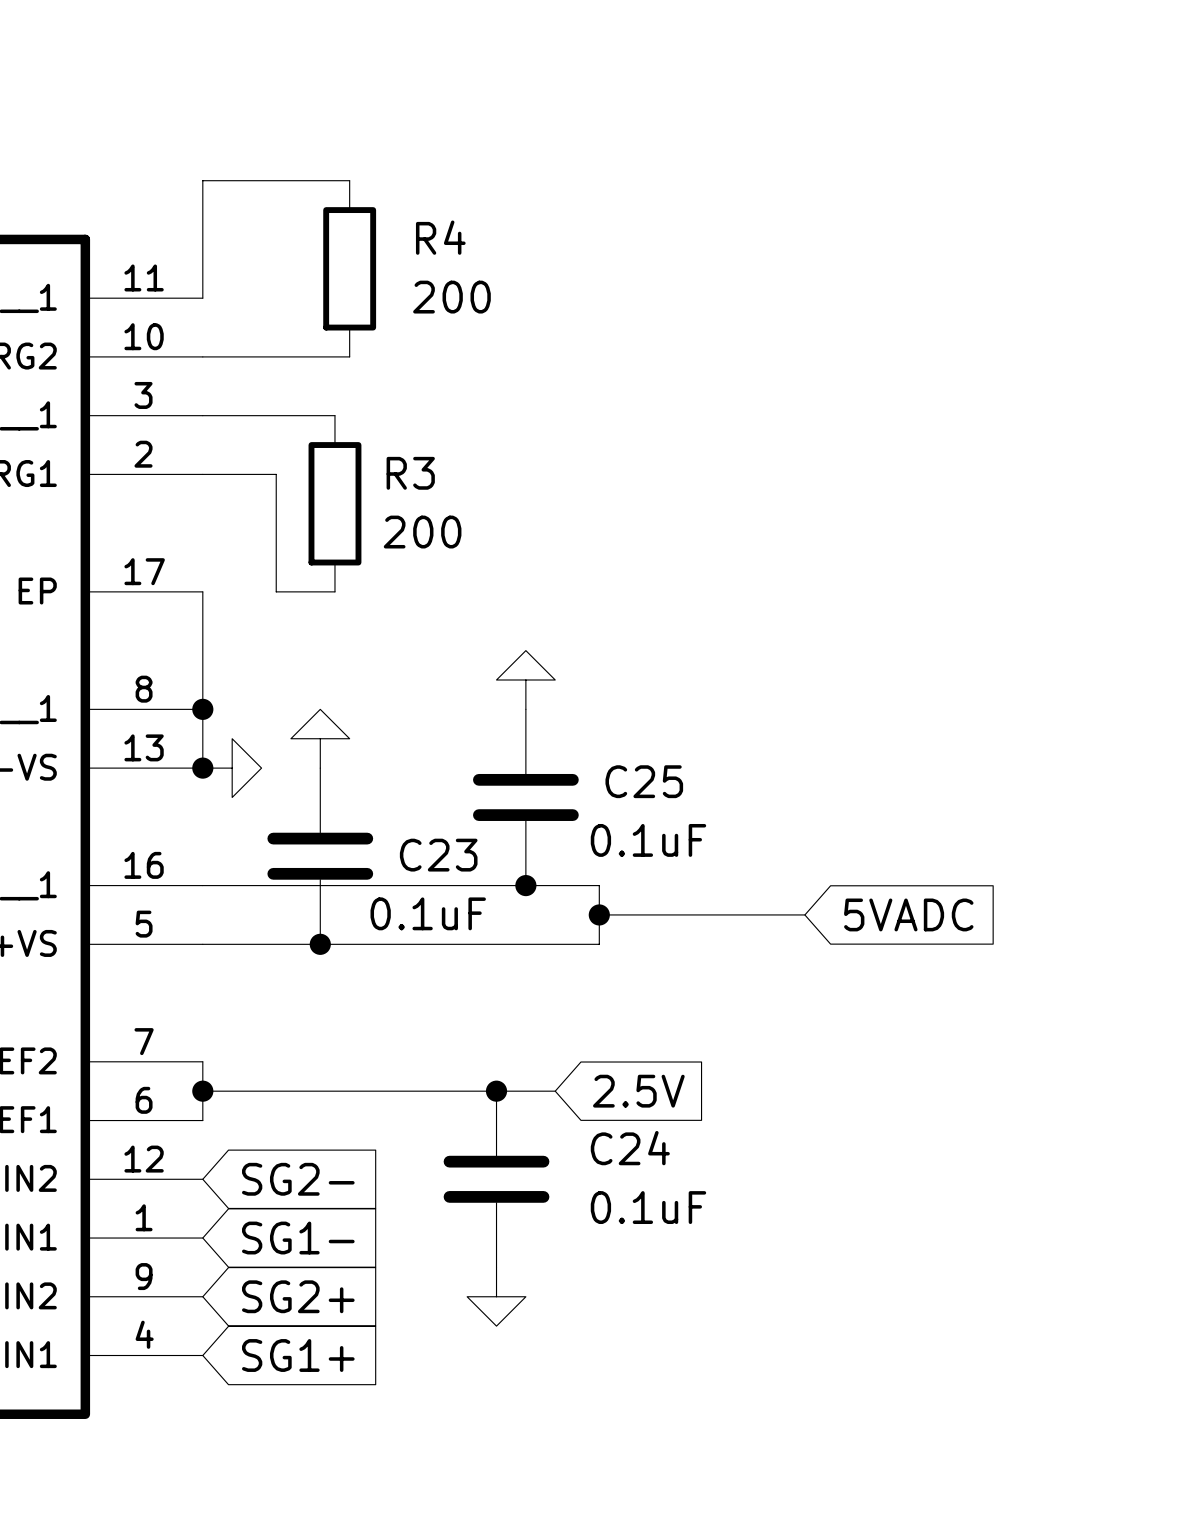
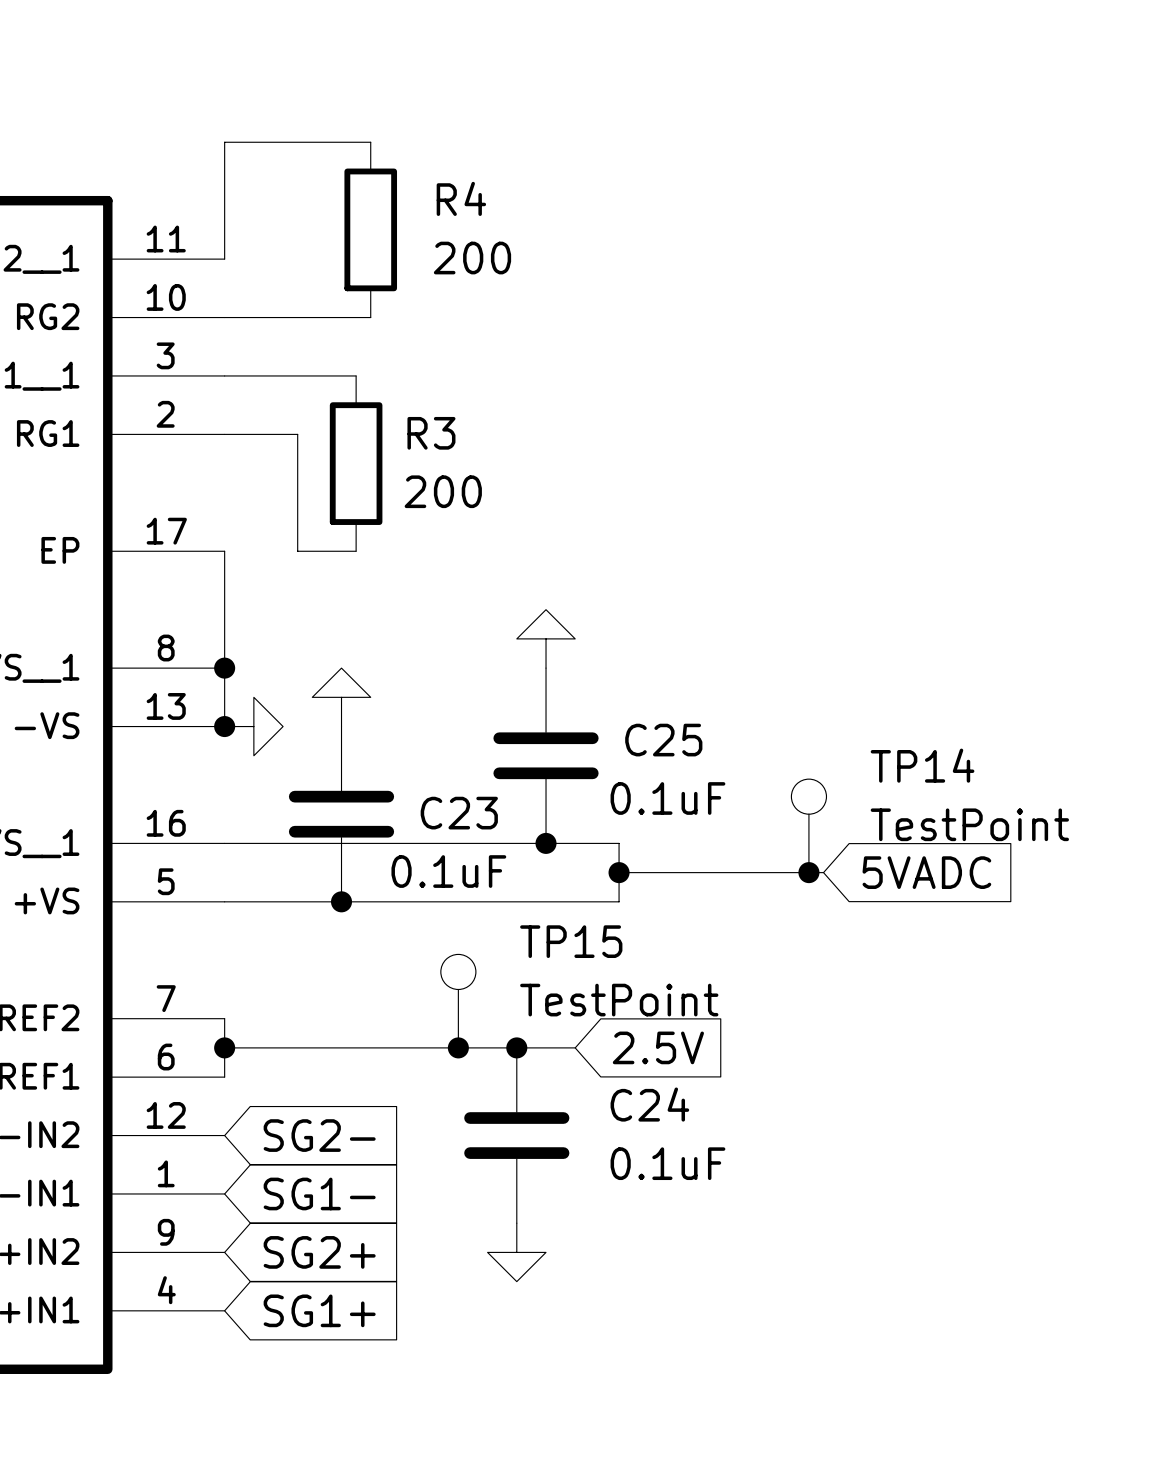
TP14: none -> TestPoint (808, 825)
junction: none -> (808, 872)
TP15: none -> TestPoint (458, 1001)
junction: none -> (458, 1047)

